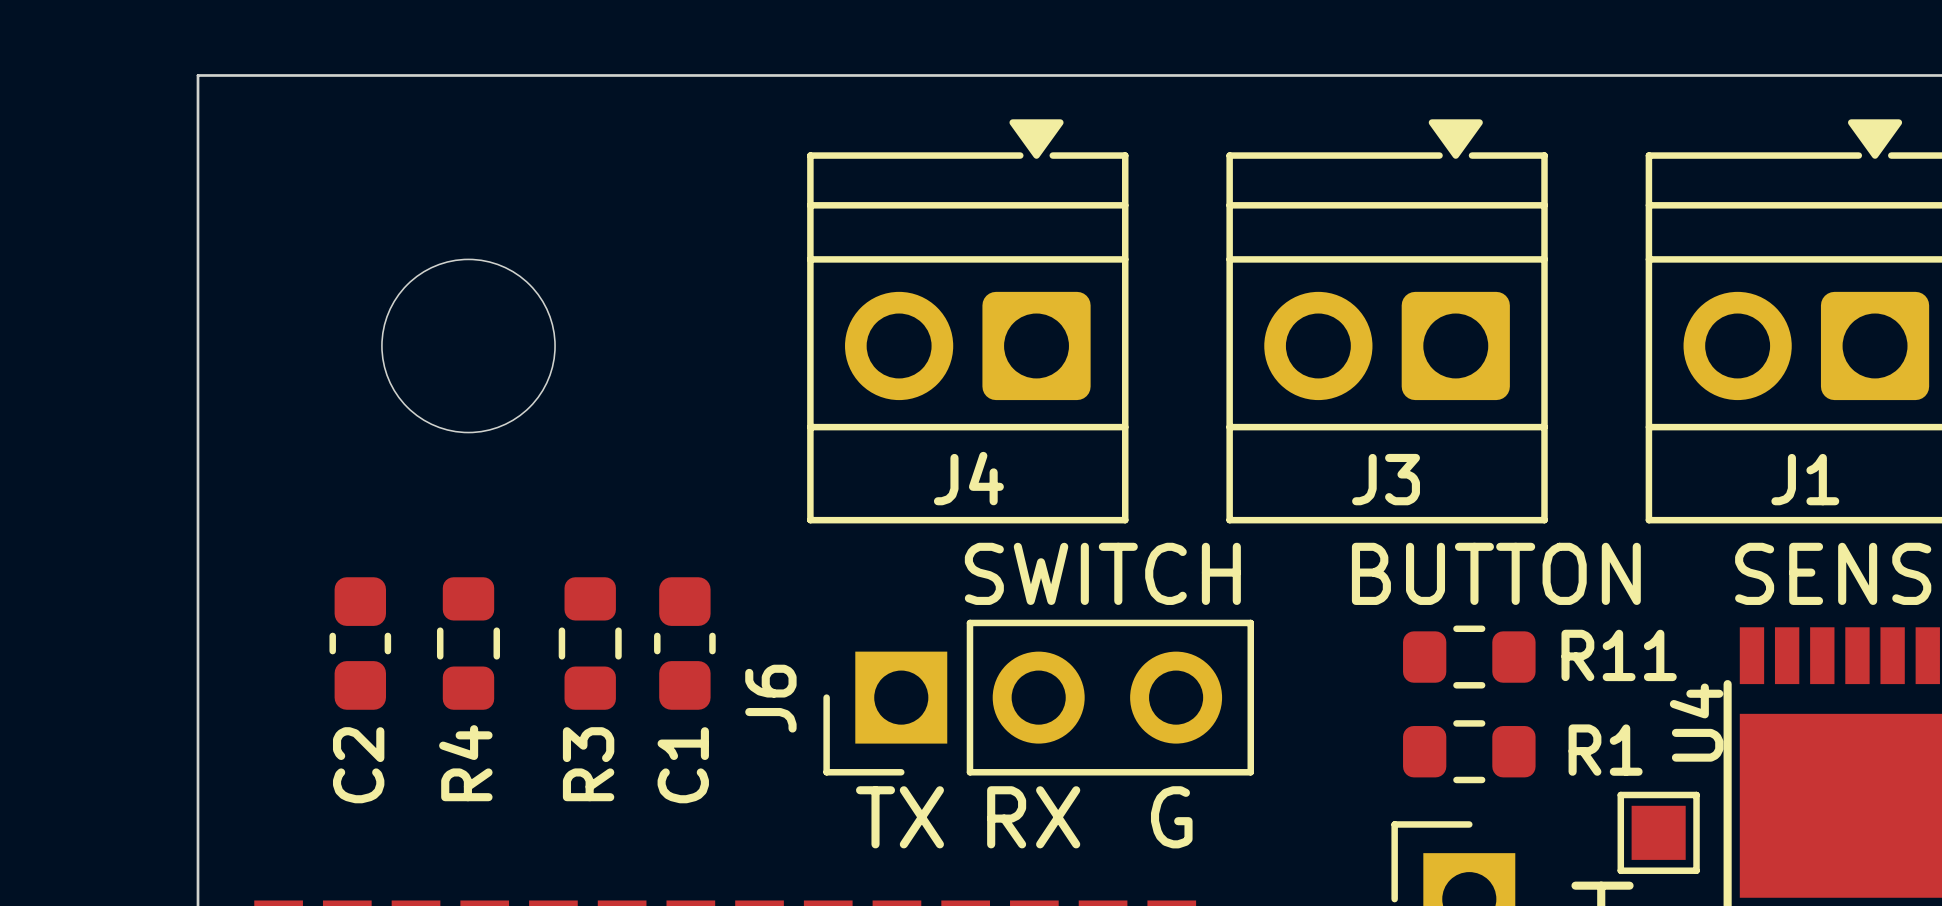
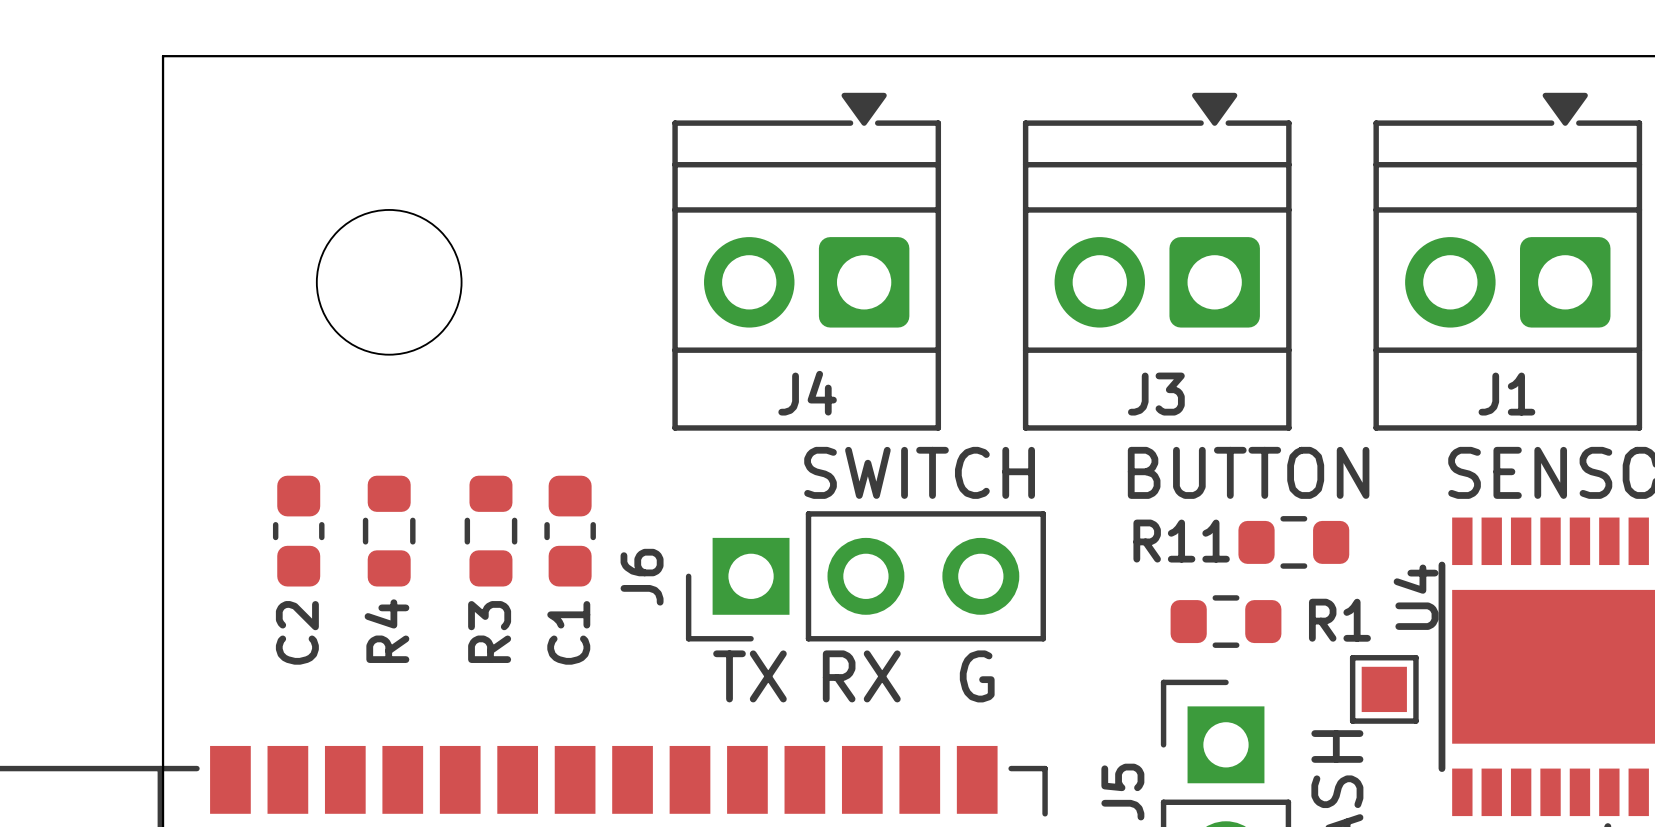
R11 name position: R11 (1619, 655) -> R11 (1181, 541)
R11 position: (1469, 657) -> (1293, 542)

